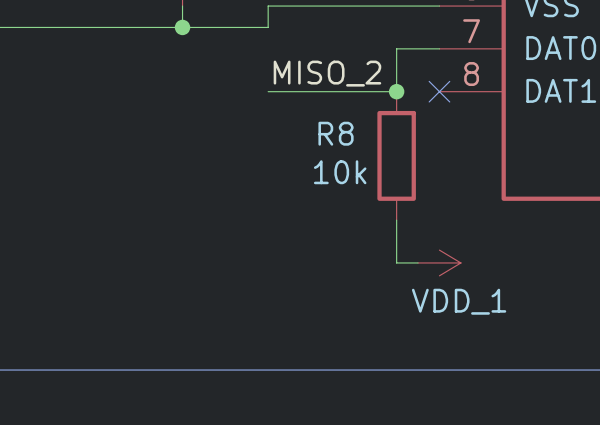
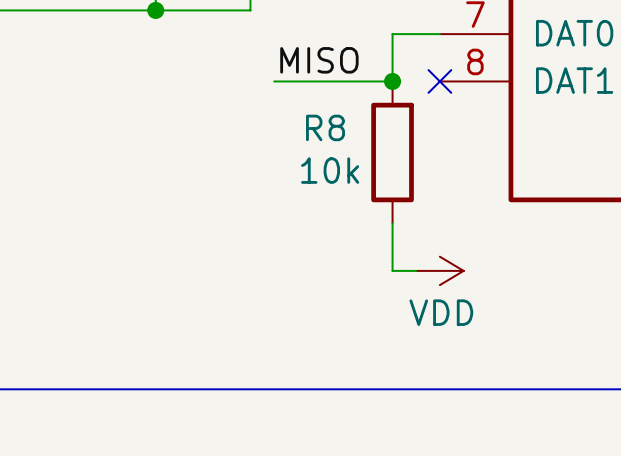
label: MISO_2 (327, 73) -> MISO (319, 60)
wire: (268, 91) (289, 91) -> none
power symbol: VDD_1 (439, 262) -> VDD (439, 270)

